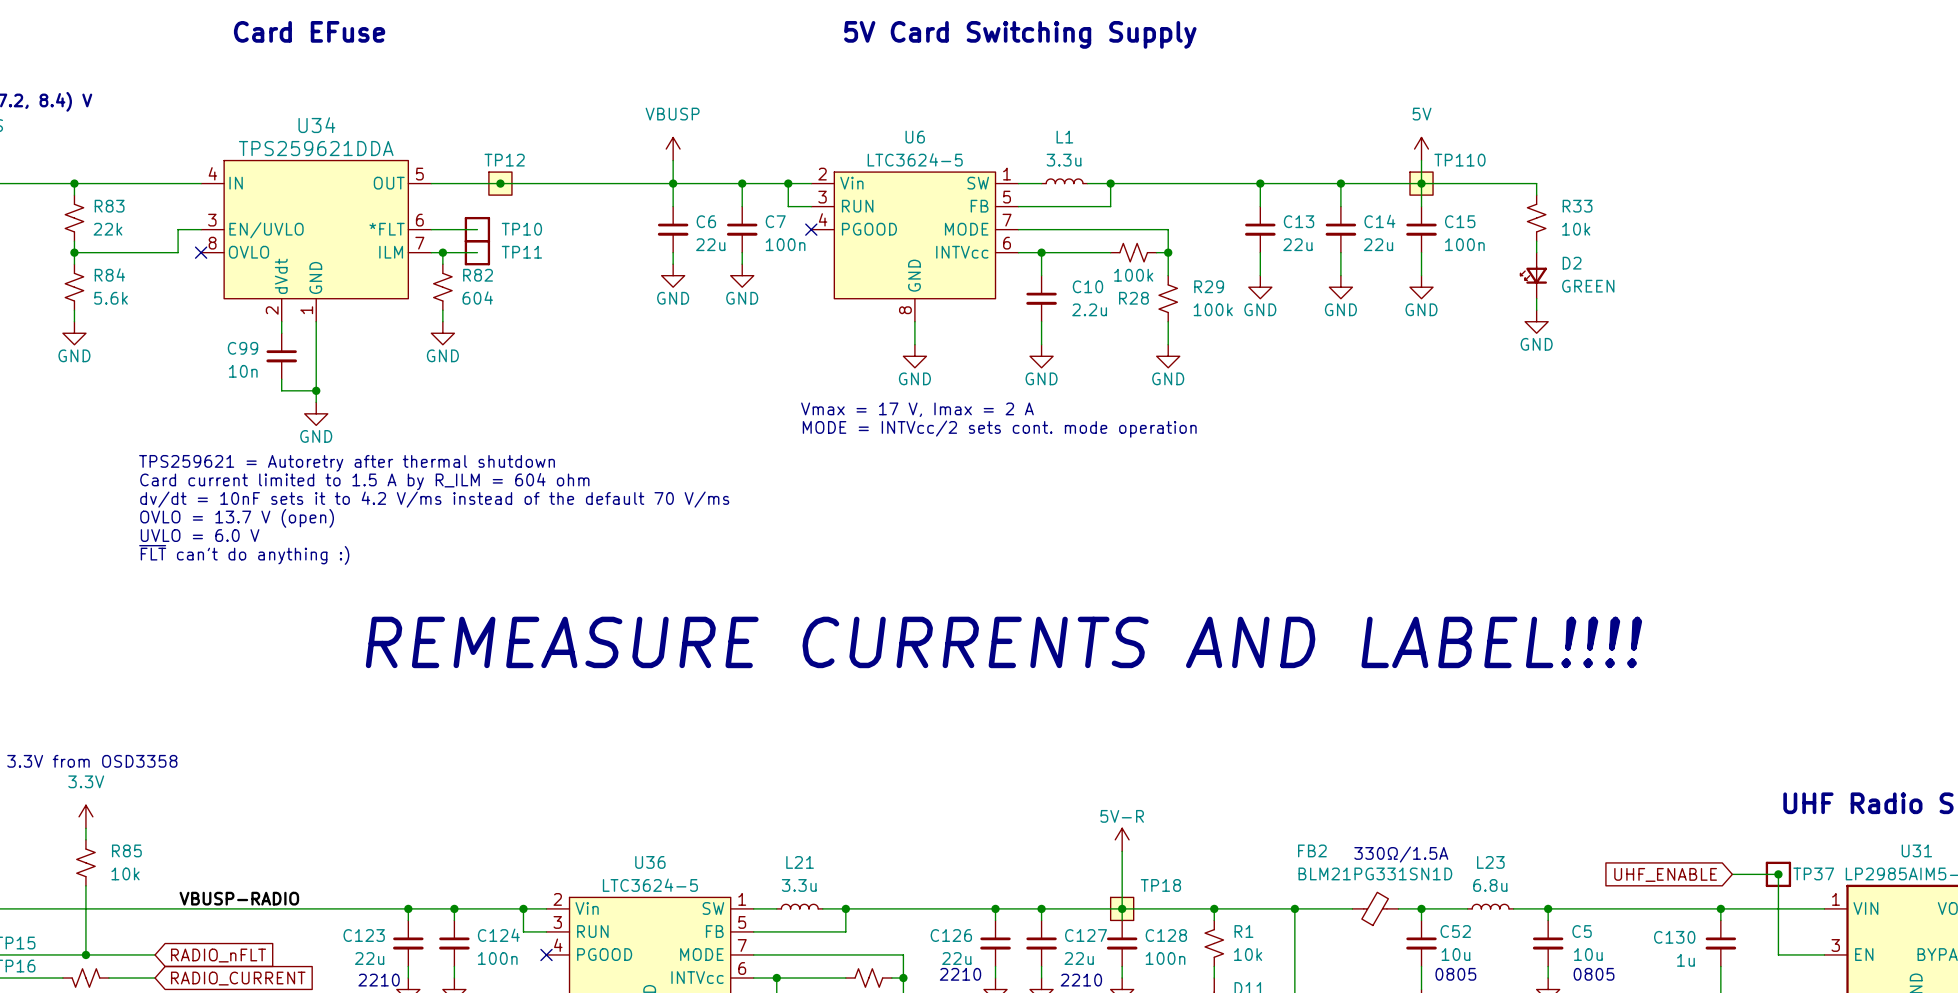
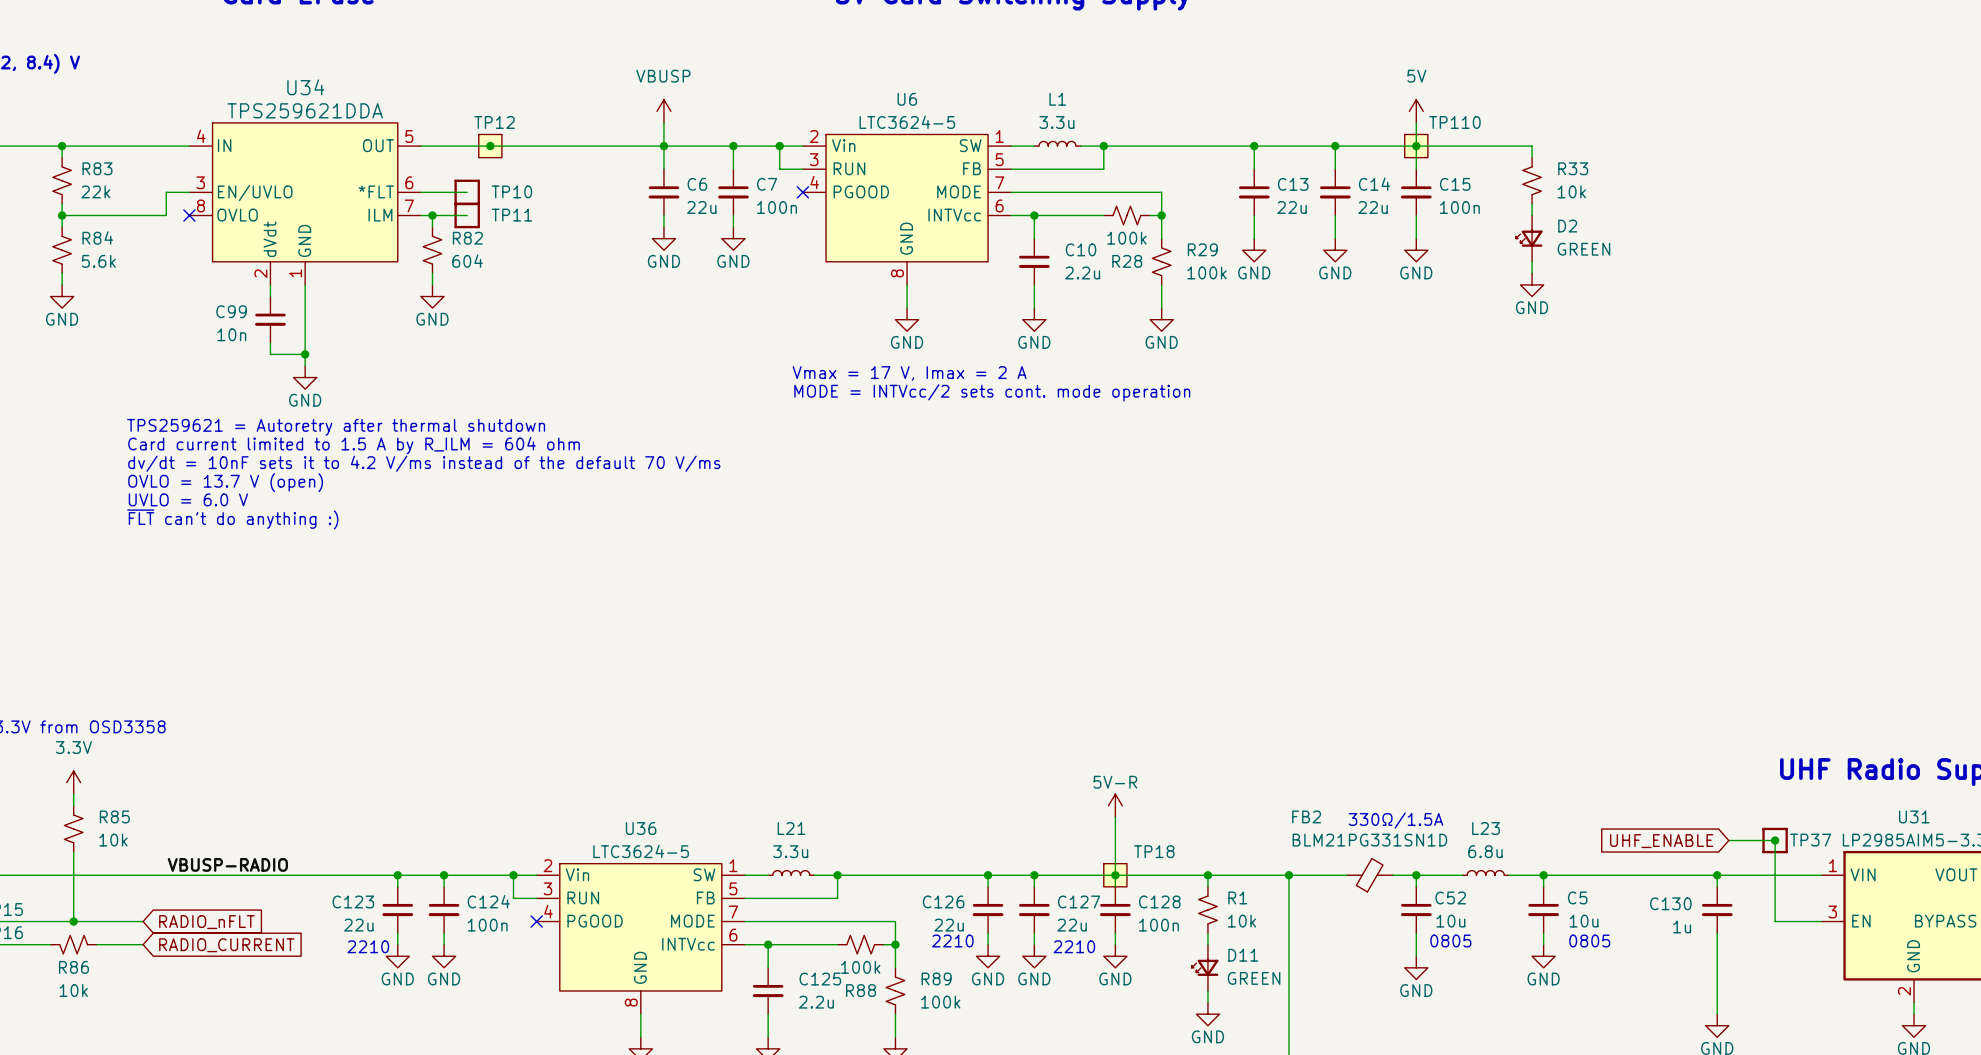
text: REMEASURE CURRENTS AND LABEL!!!! (1003, 642) -> none

